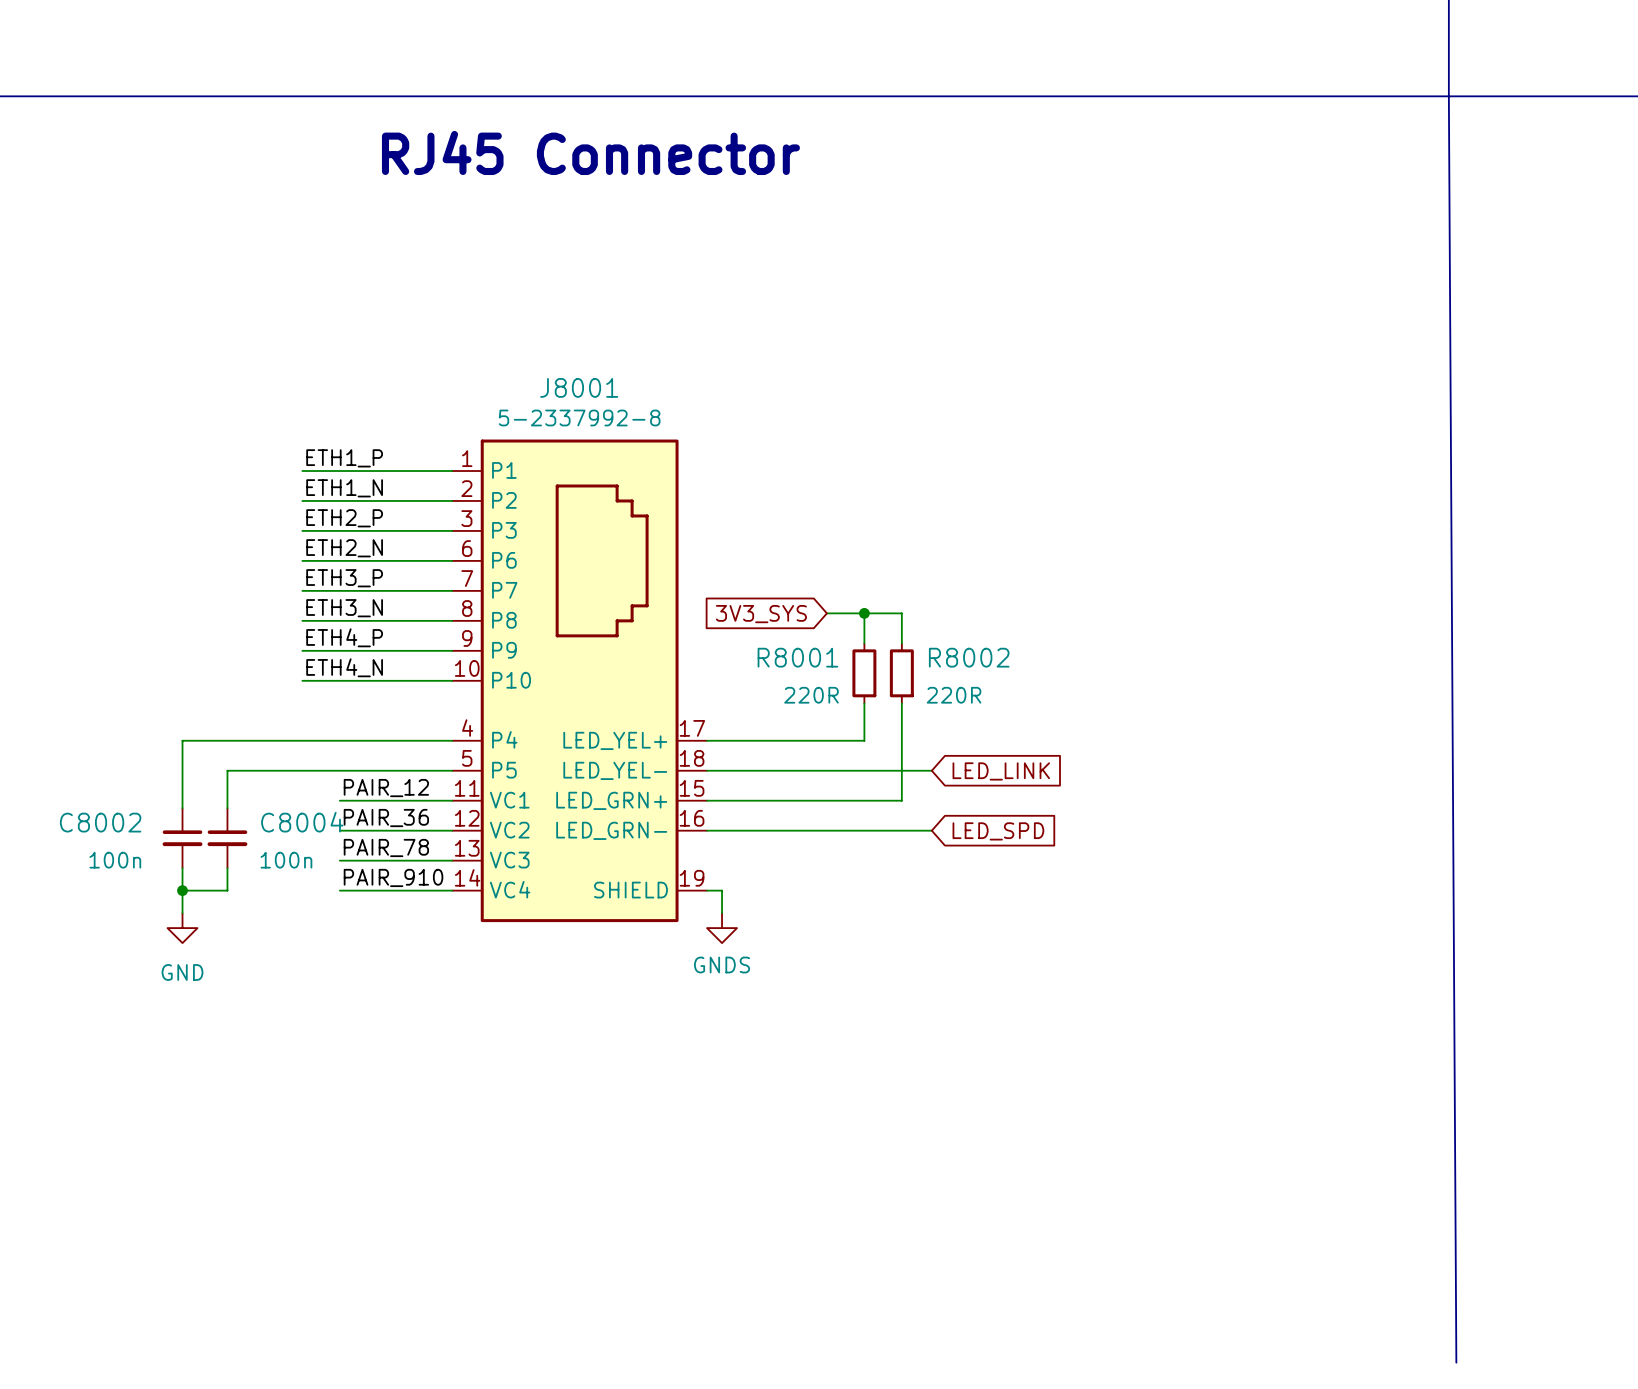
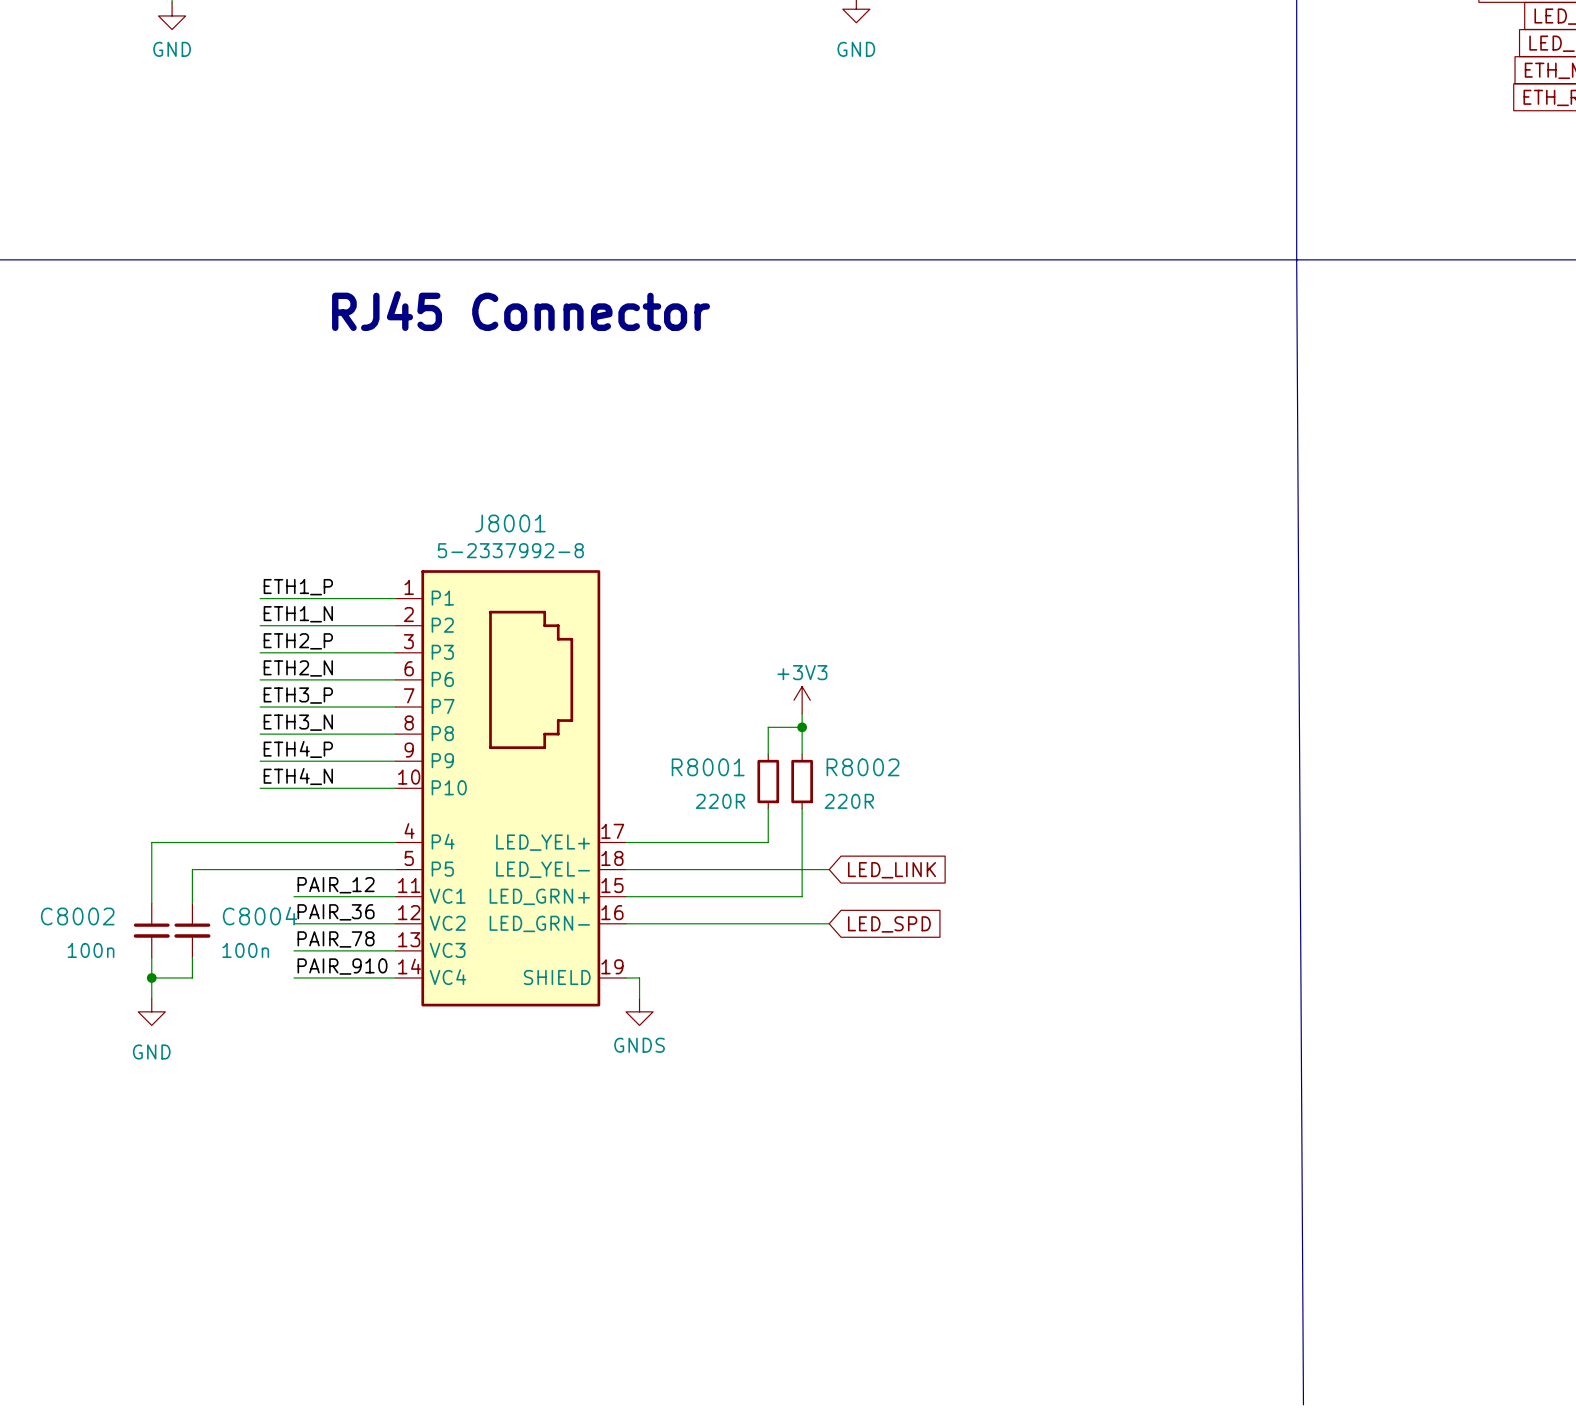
power symbol: none -> +3V3 (802, 700)
wire: none -> (802, 713) (802, 727)
wire: (826, 613) (864, 613) -> none
junction position: (864, 613) -> (802, 727)
global label: 3V3_SYS (761, 614) -> none

